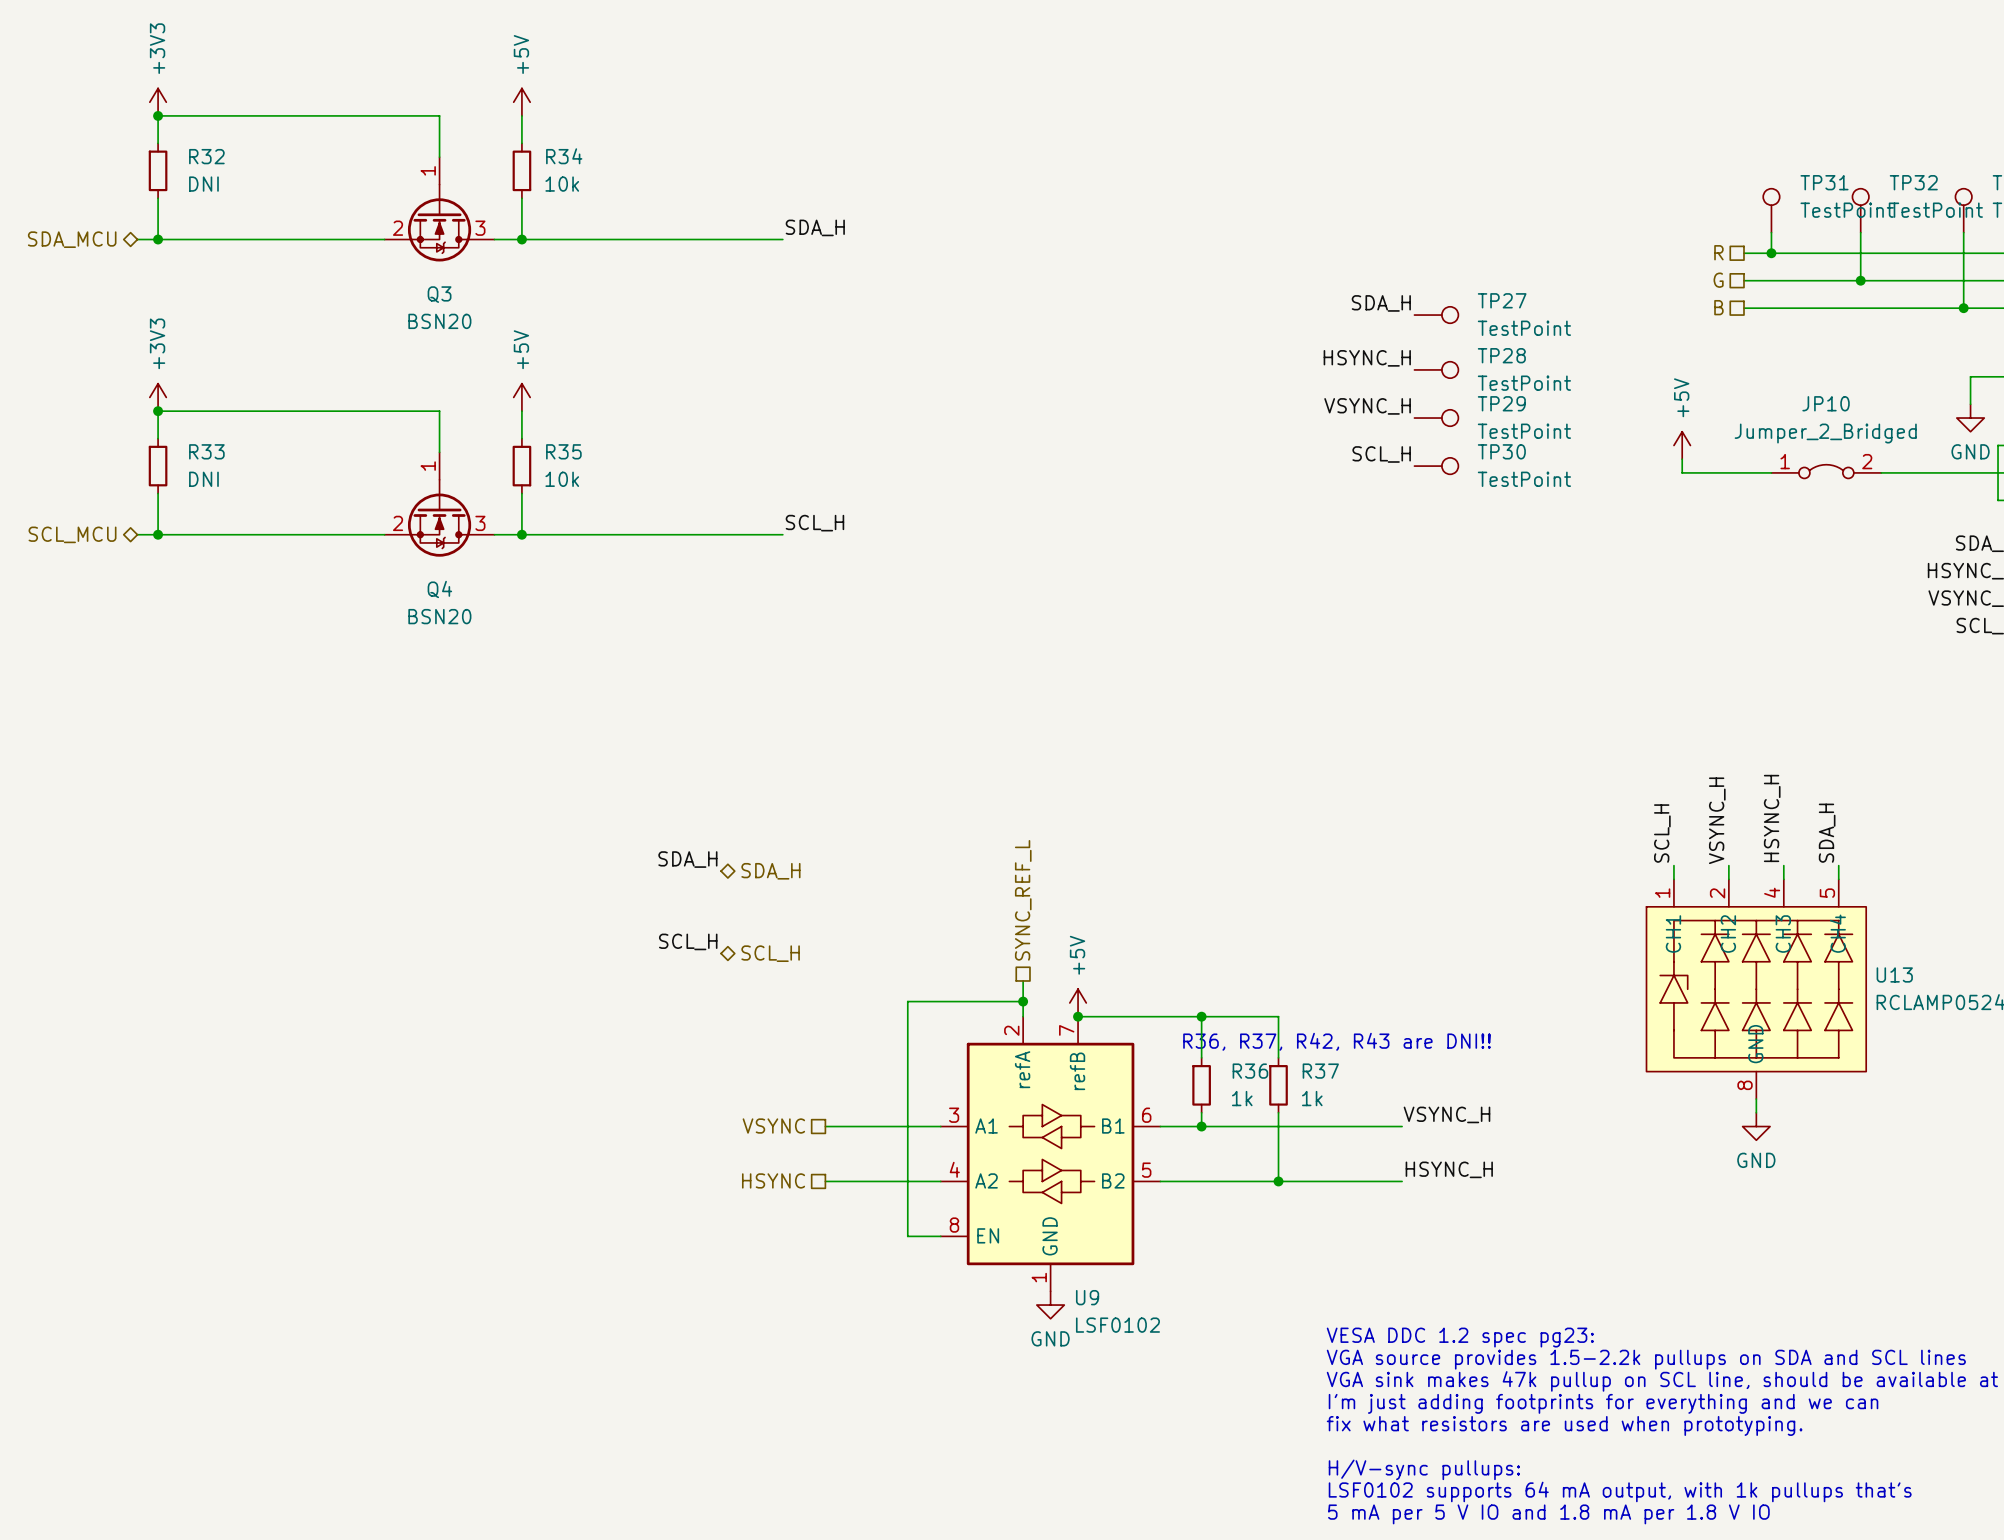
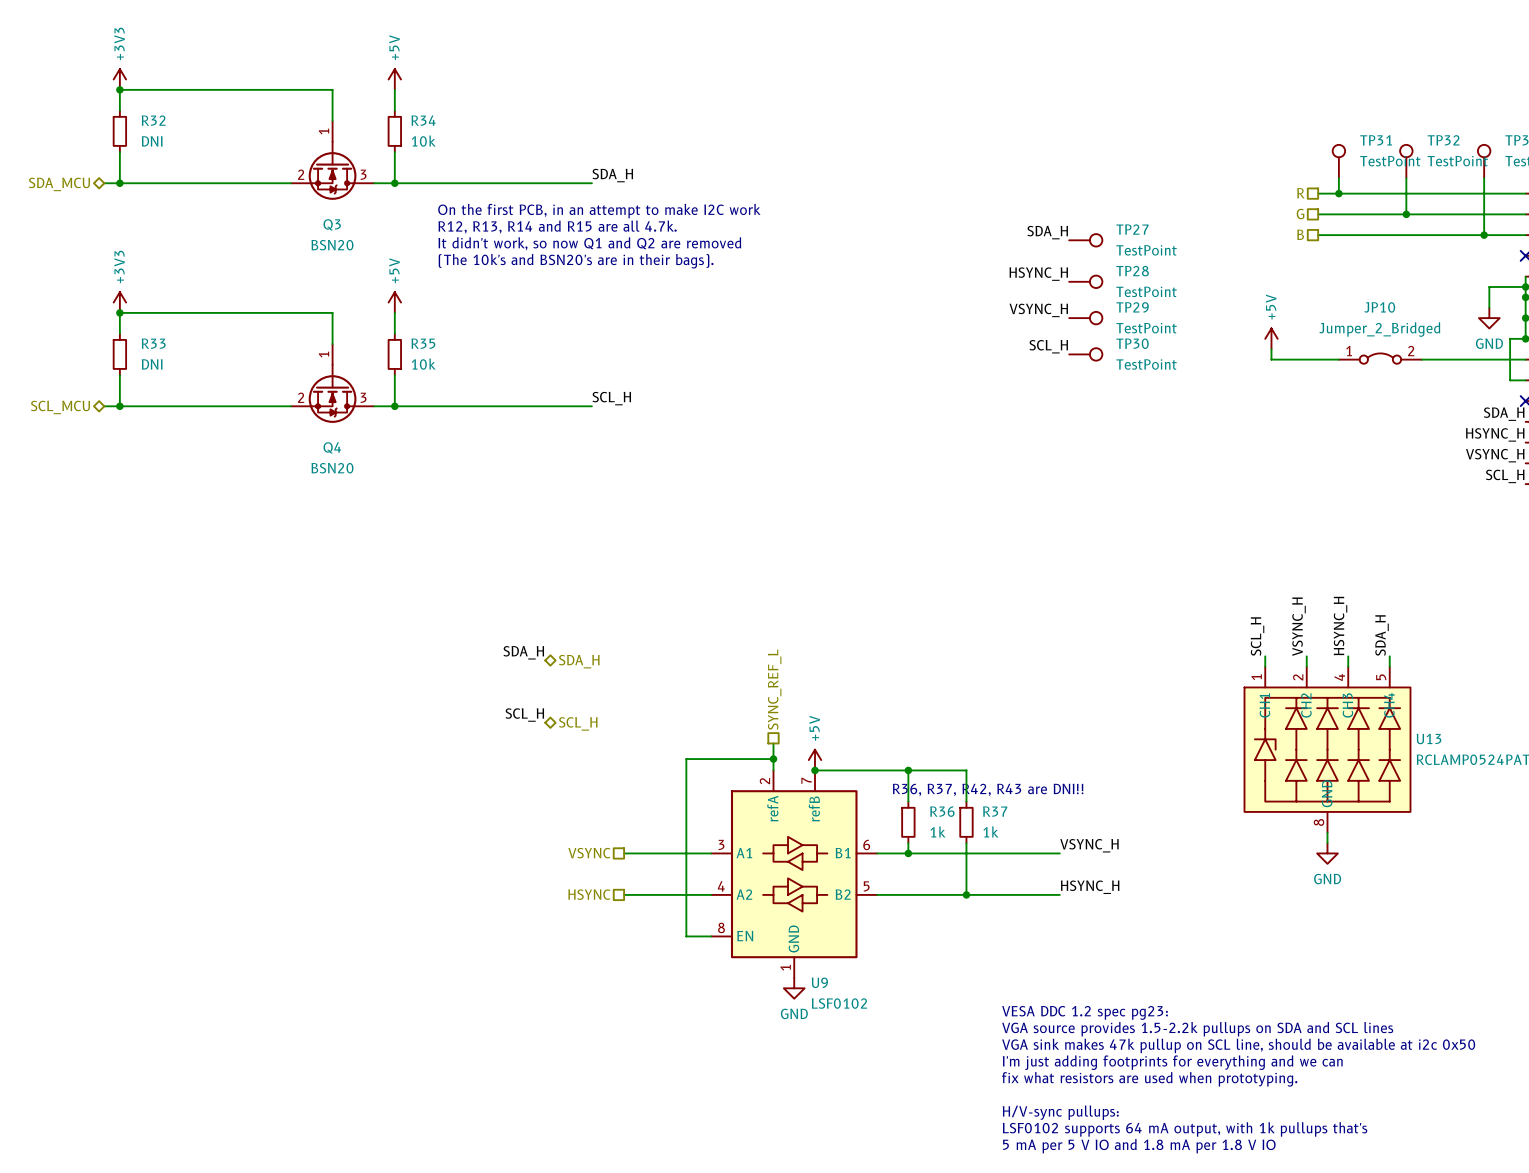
text: none -> On the first PCB, in an attempt to make I2C work (599, 211)
text: none -> R12, R13, R14 and R15 are all 4.7k. (557, 227)
text: none -> It didn't work, so now Q1 and Q2 are removed (589, 243)
text: none -> (The 10k's and BSN20's are in their bags). (576, 261)

